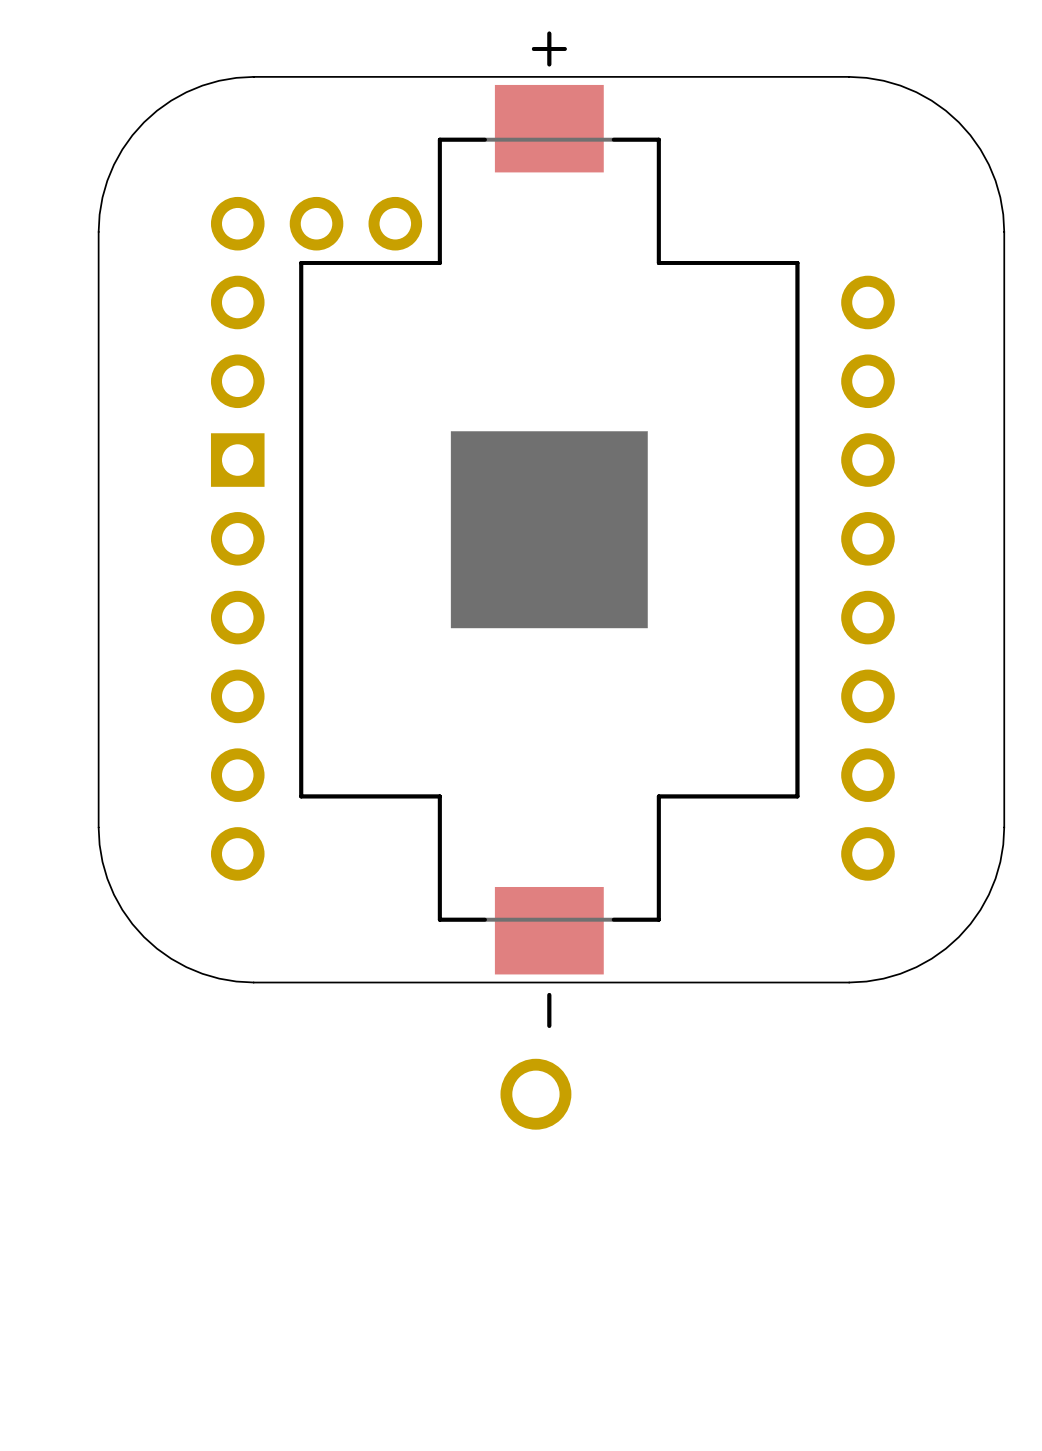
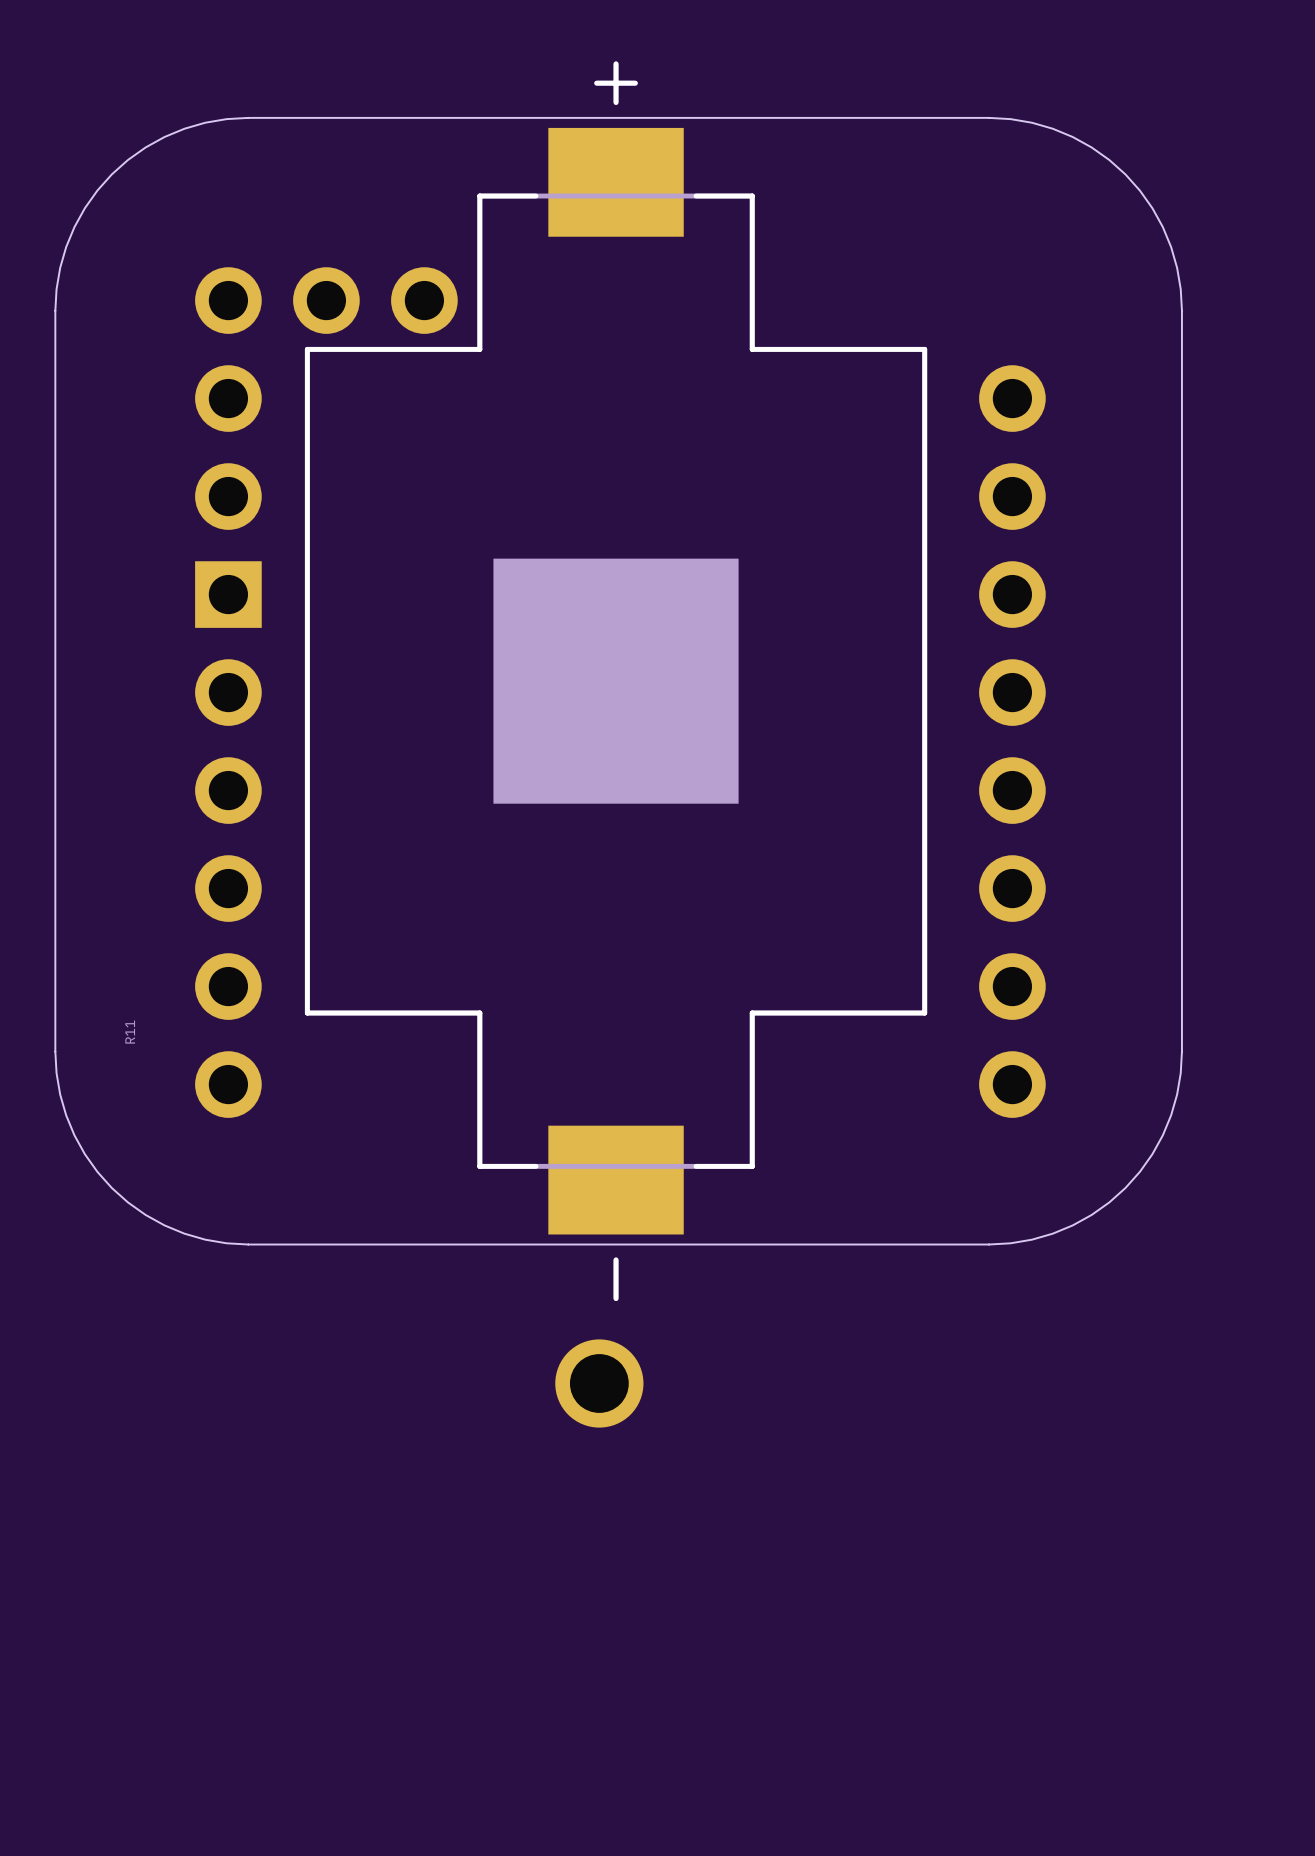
R11: none -> (130, 1032)

